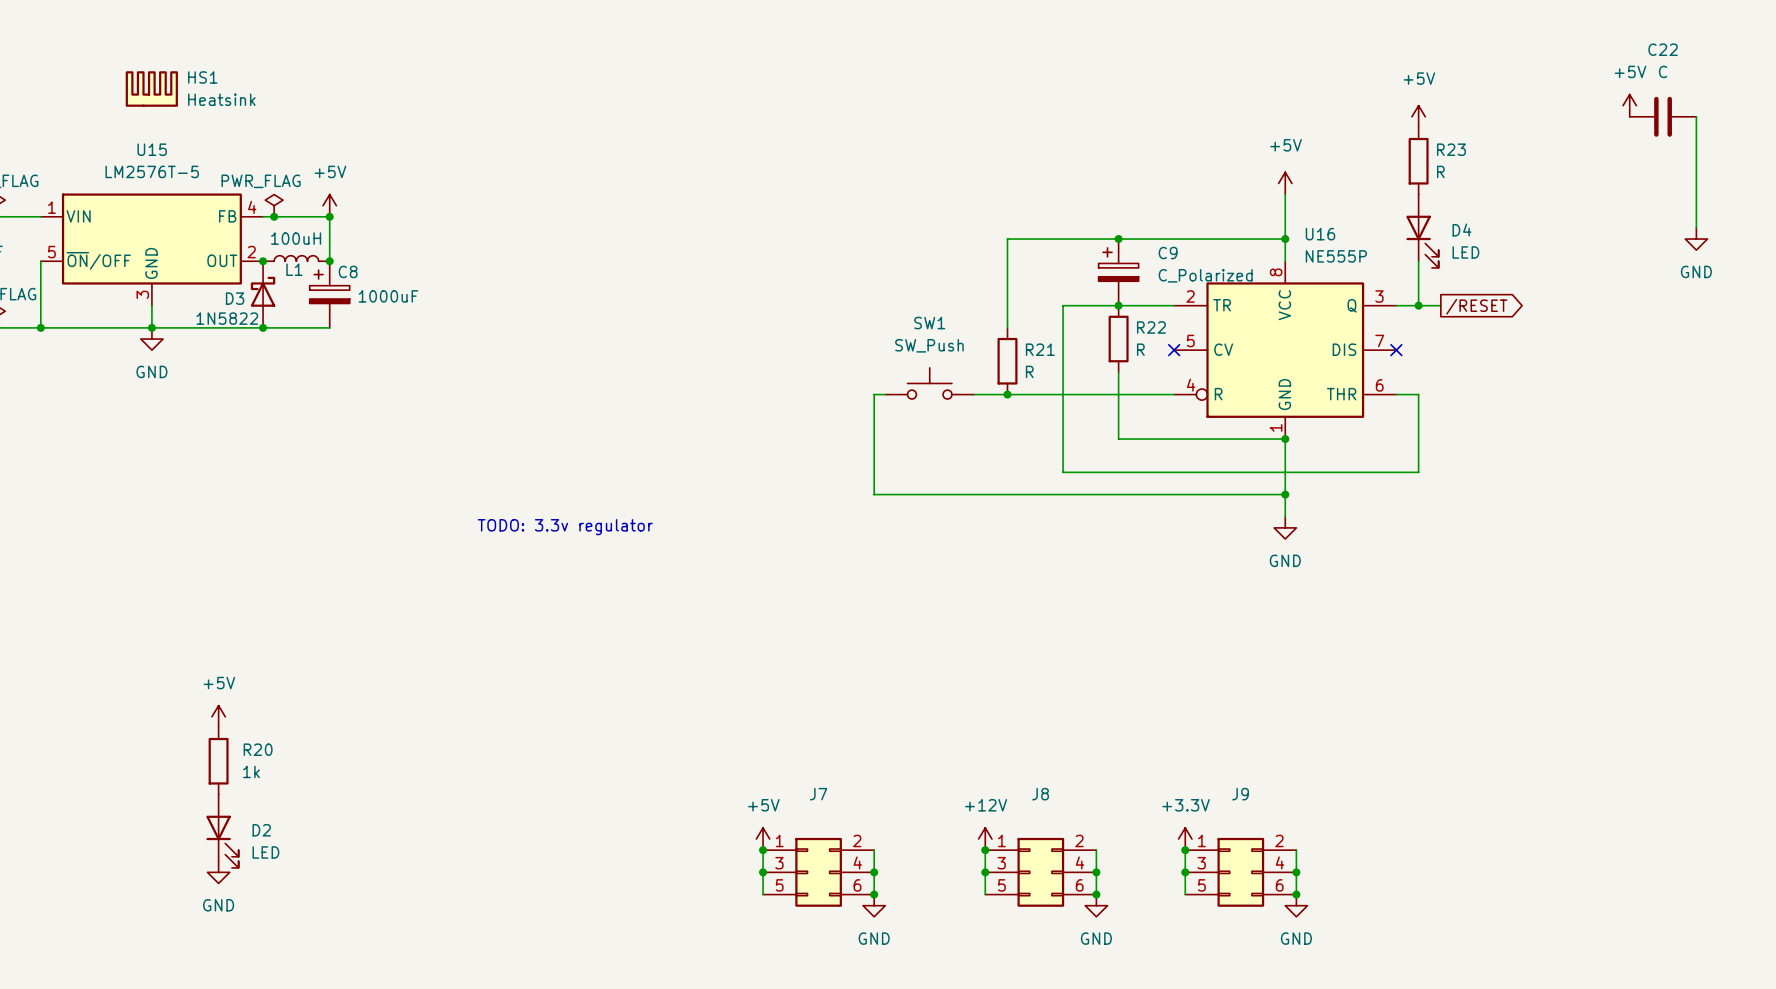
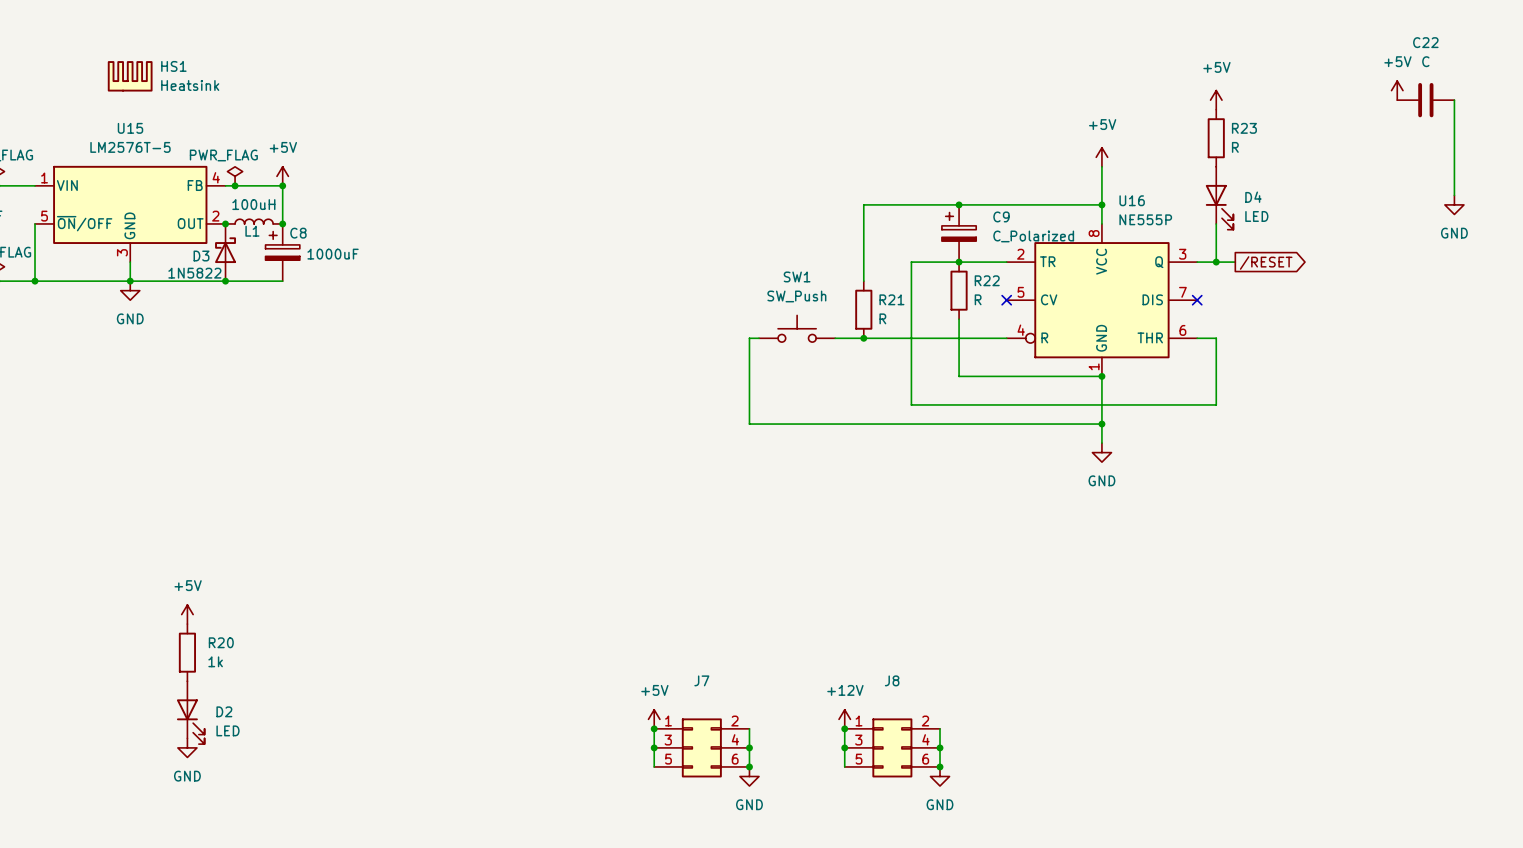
text: TODO: 3.3v regulator (565, 527) -> none
power symbol: +3.3V (1185, 839) -> none
wire: (1185, 850) (1185, 894) -> none
junction: (1185, 850) -> none
wire: (1296, 850) (1296, 894) -> none
junction: (1185, 872) -> none
J9: (1240, 872) -> none
junction: (1296, 872) -> none
junction: (1296, 894) -> none
power symbol: GND (1296, 905) -> none

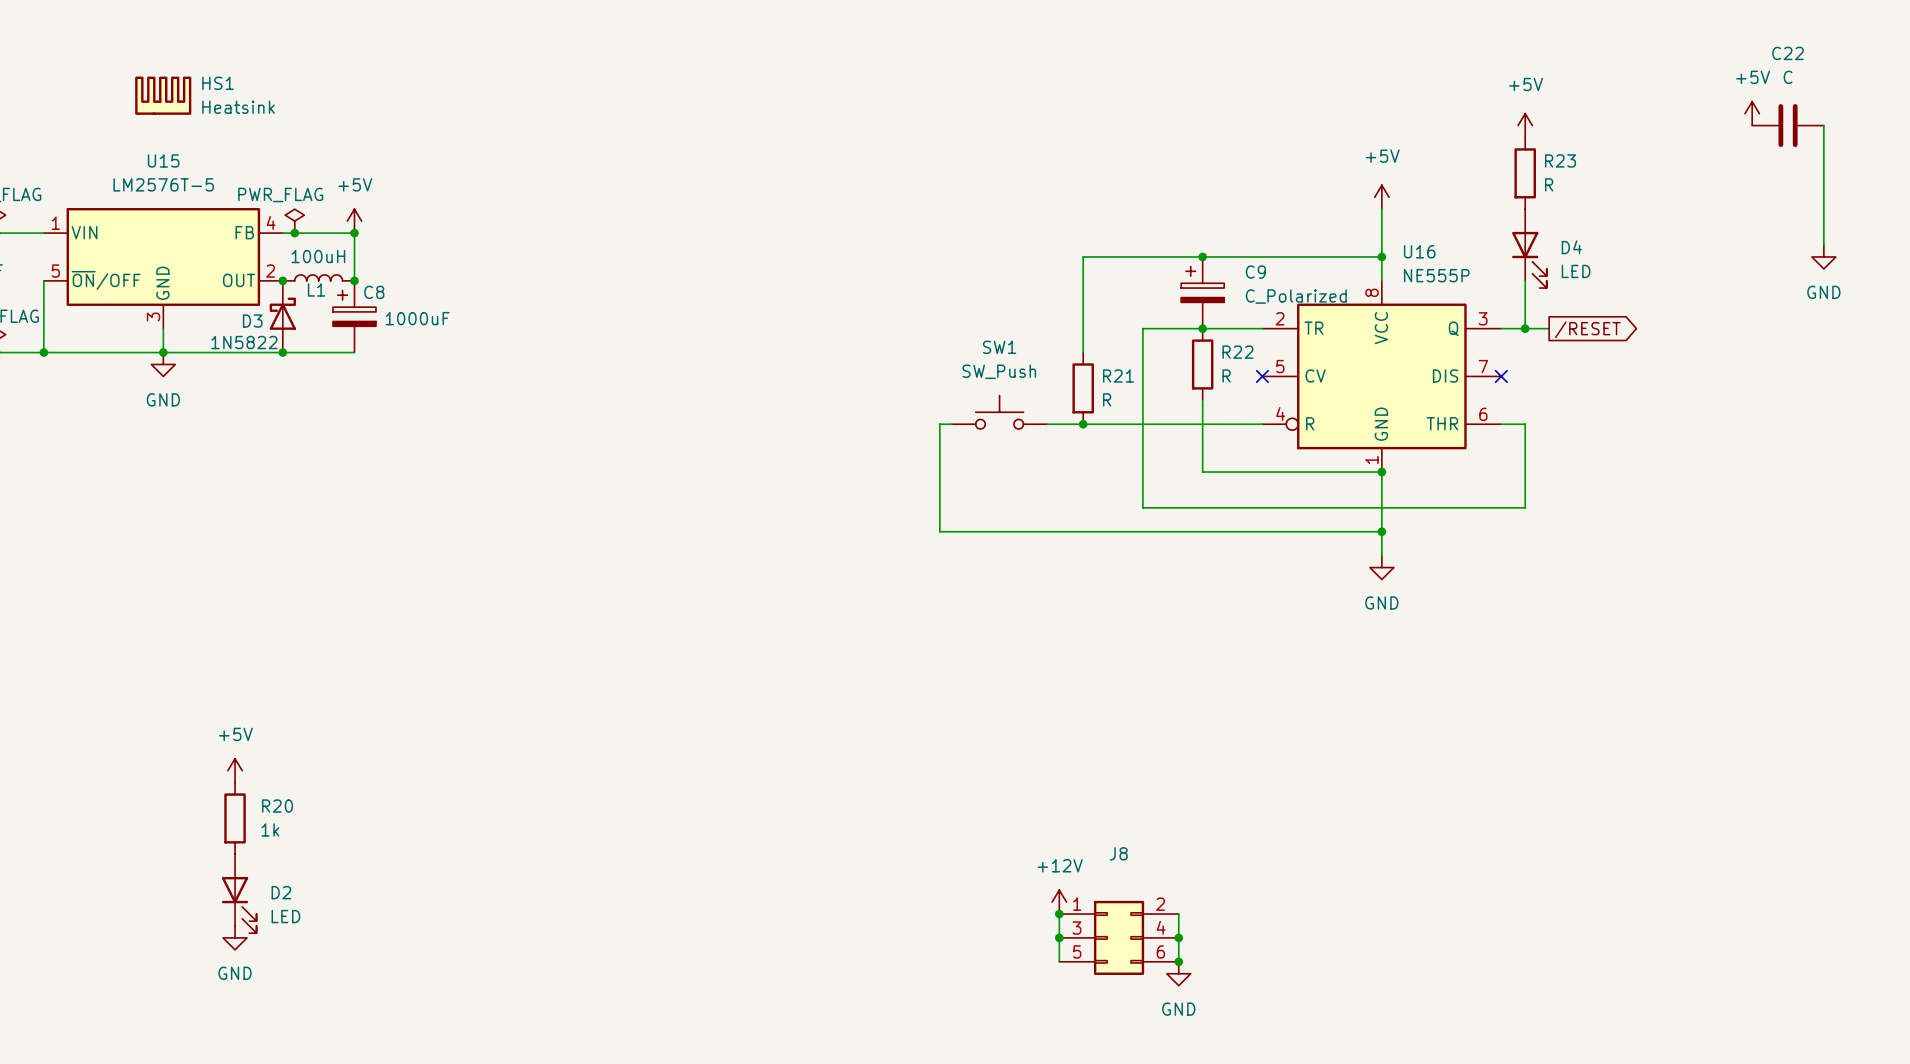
power symbol: +5V (654, 719) -> none
wire: (654, 728) (654, 766) -> none
junction: (654, 728) -> none
wire: (749, 728) (749, 766) -> none
junction: (654, 747) -> none
J7: (701, 747) -> none
junction: (749, 747) -> none
junction: (749, 766) -> none
power symbol: GND (749, 776) -> none

